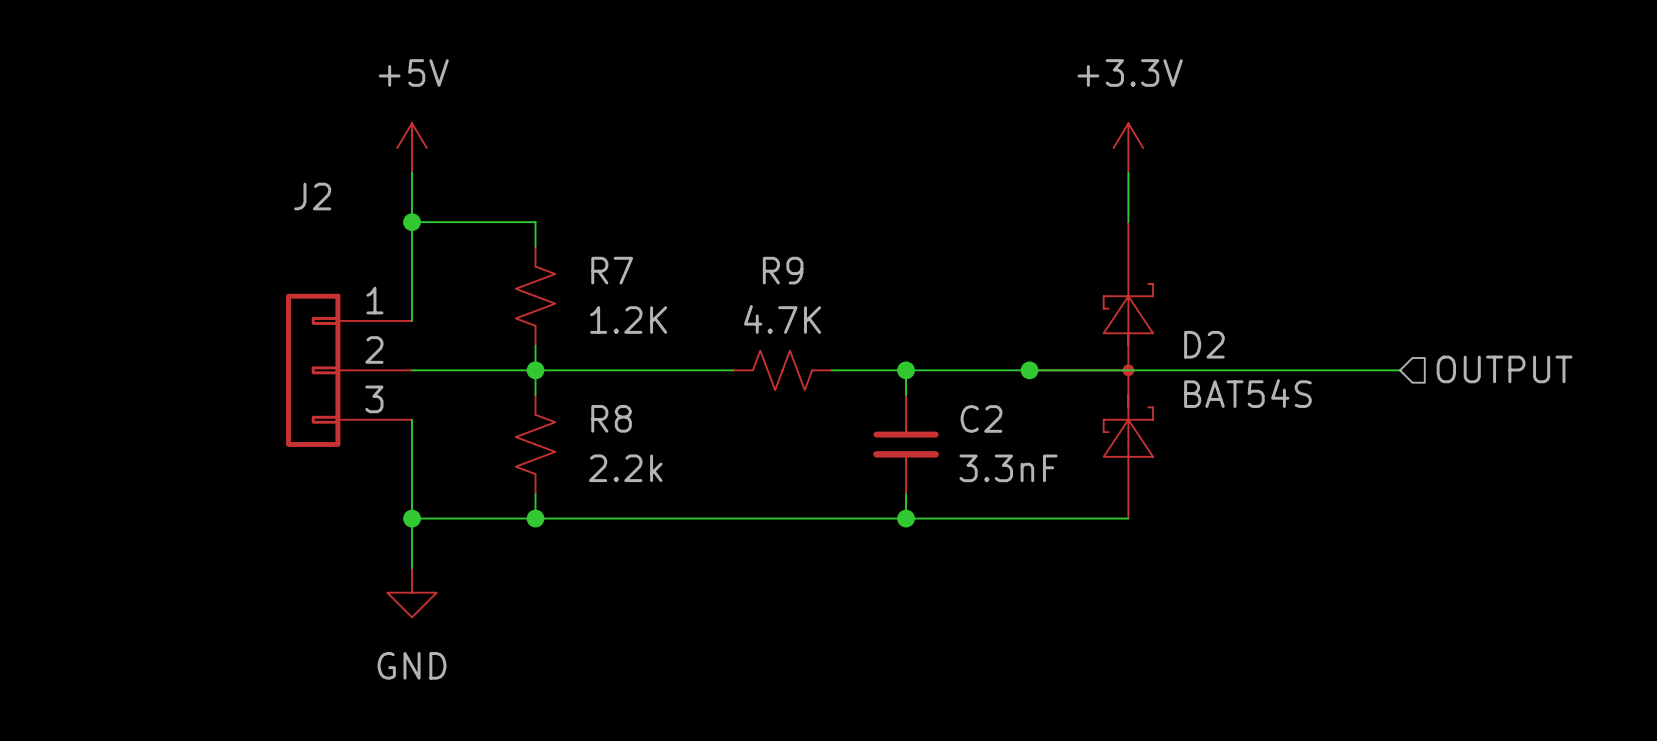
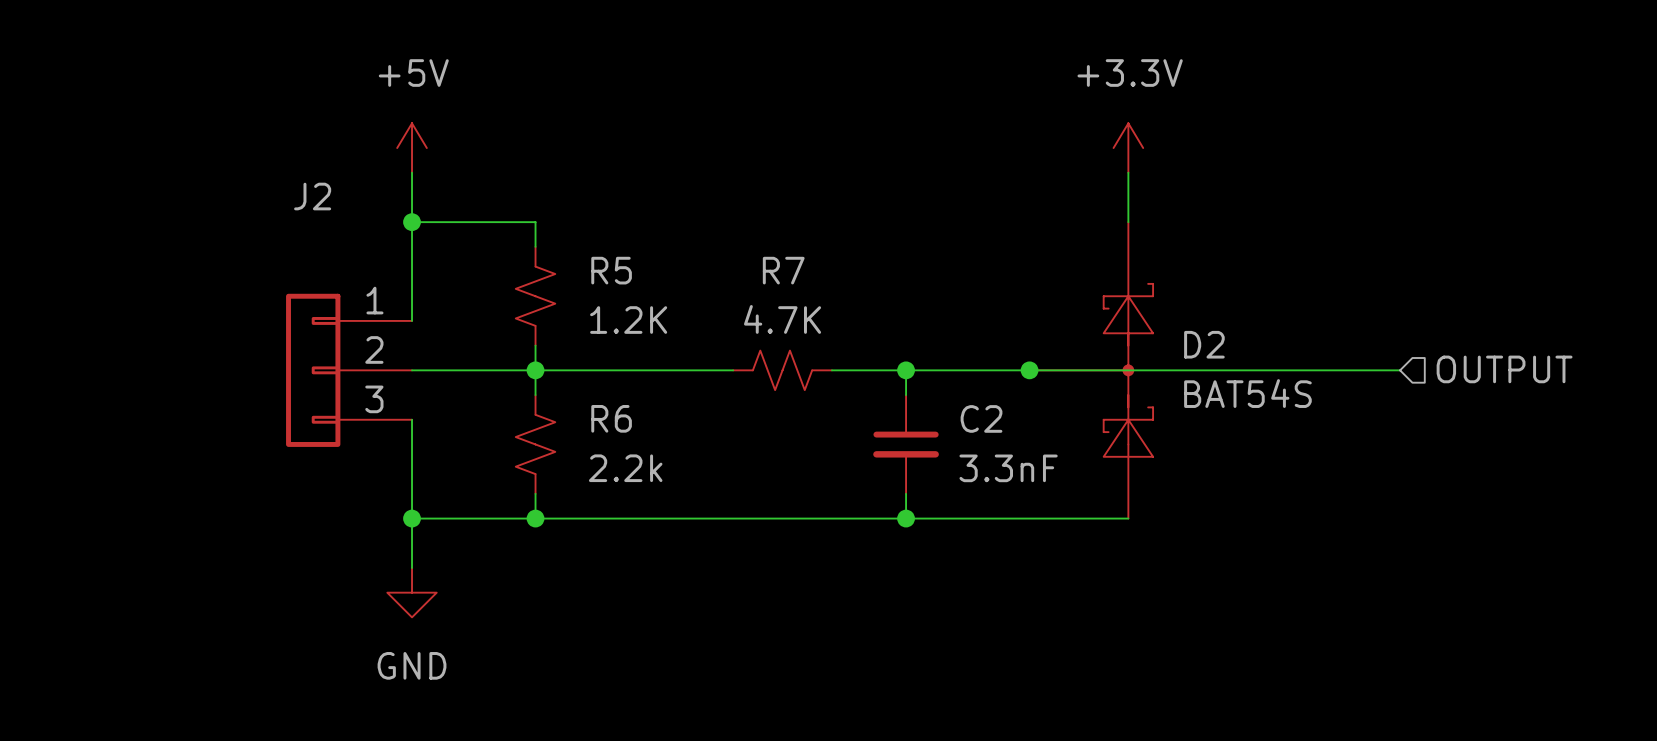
R7 name: R7 (612, 270) -> R5 (611, 270)
R9 name: R9 (783, 270) -> R7 (783, 270)
R8 name: R8 (611, 418) -> R6 (611, 418)

